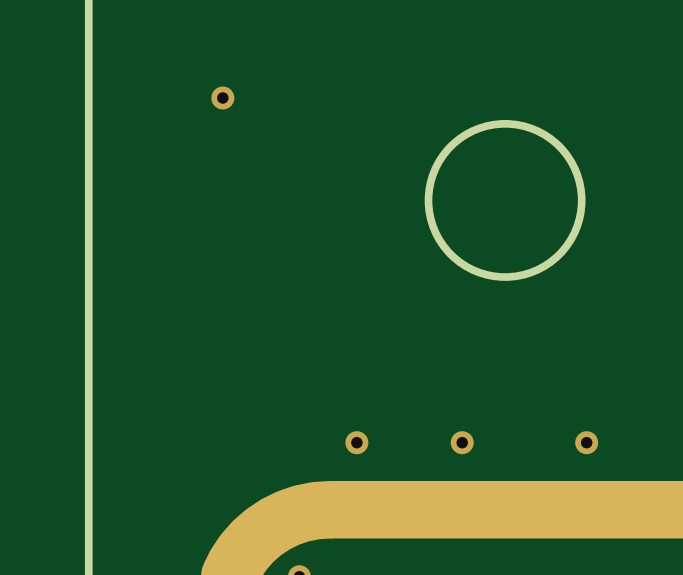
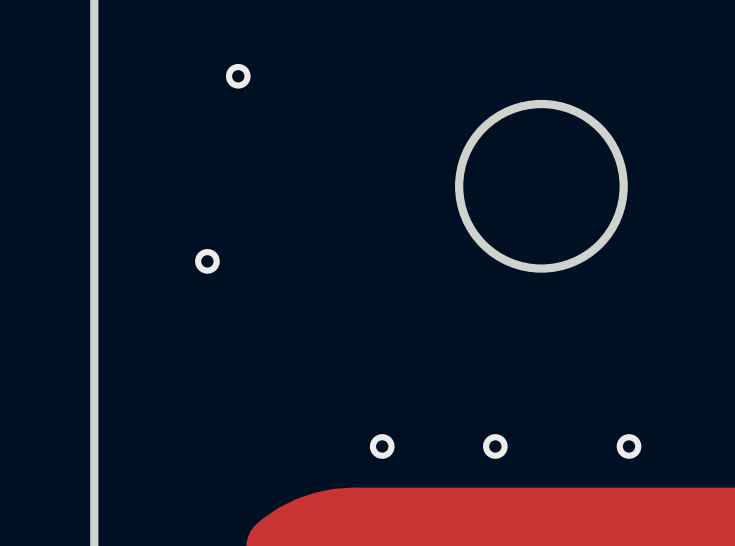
via: none -> (207, 261)

